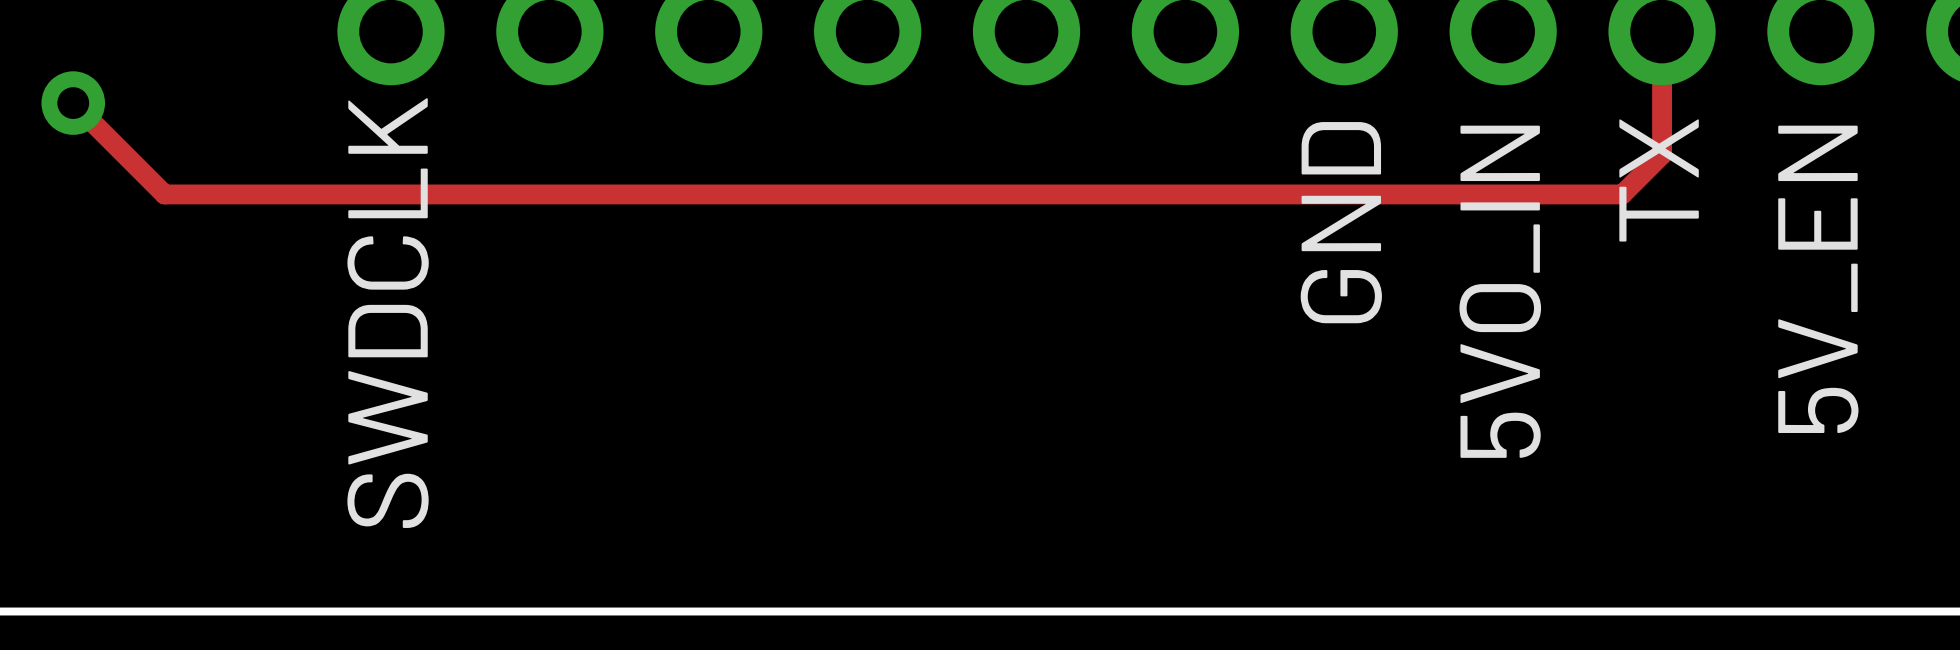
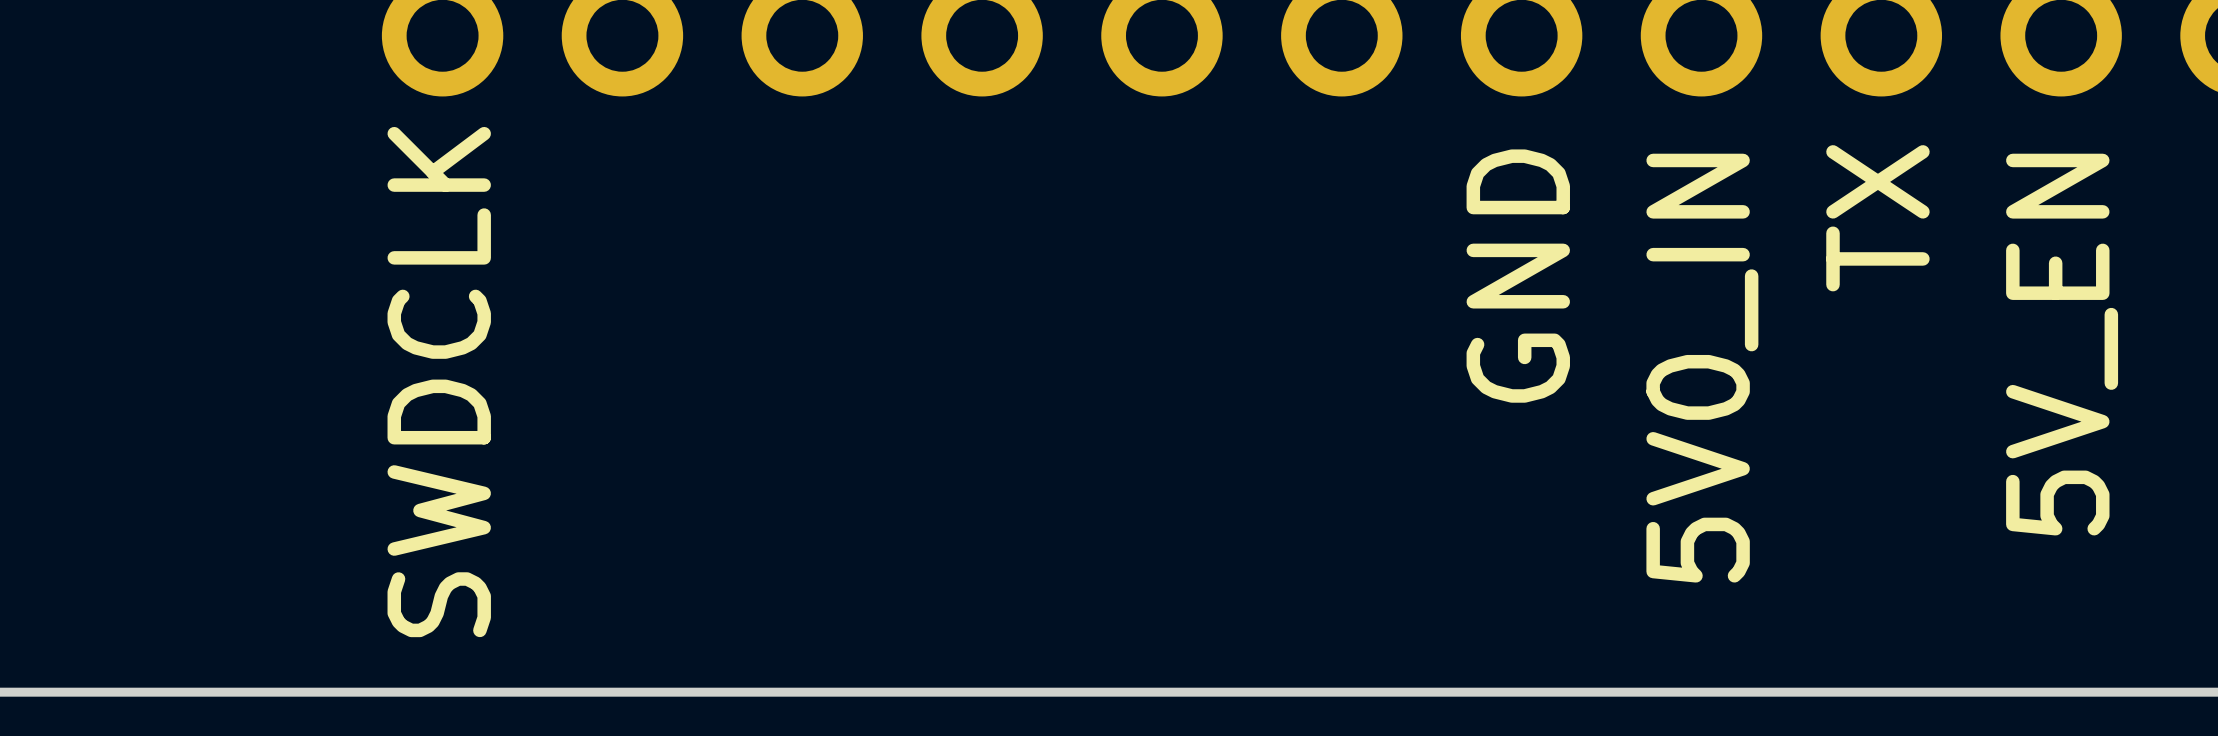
track: (1662, 31) (1662, 154) (1622, 194) (164, 194) (73, 103) -> none
via: (73, 103) -> none

